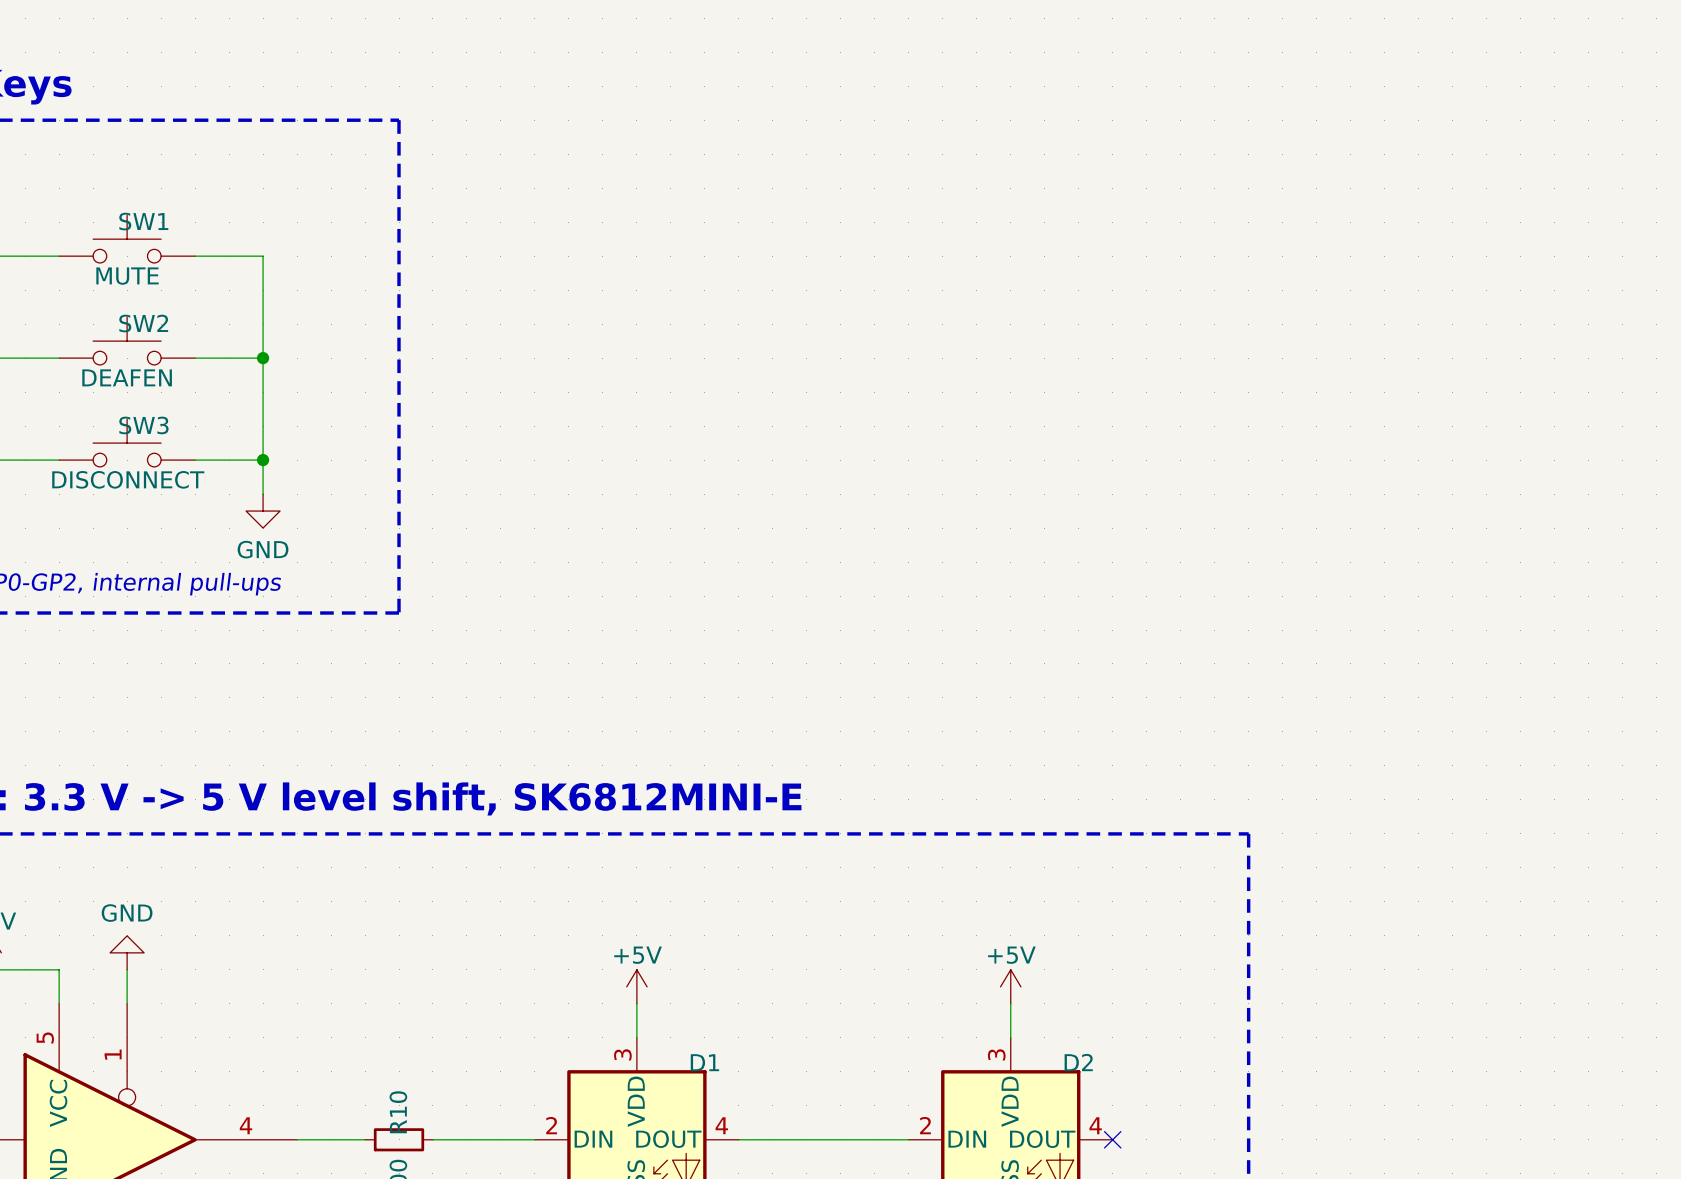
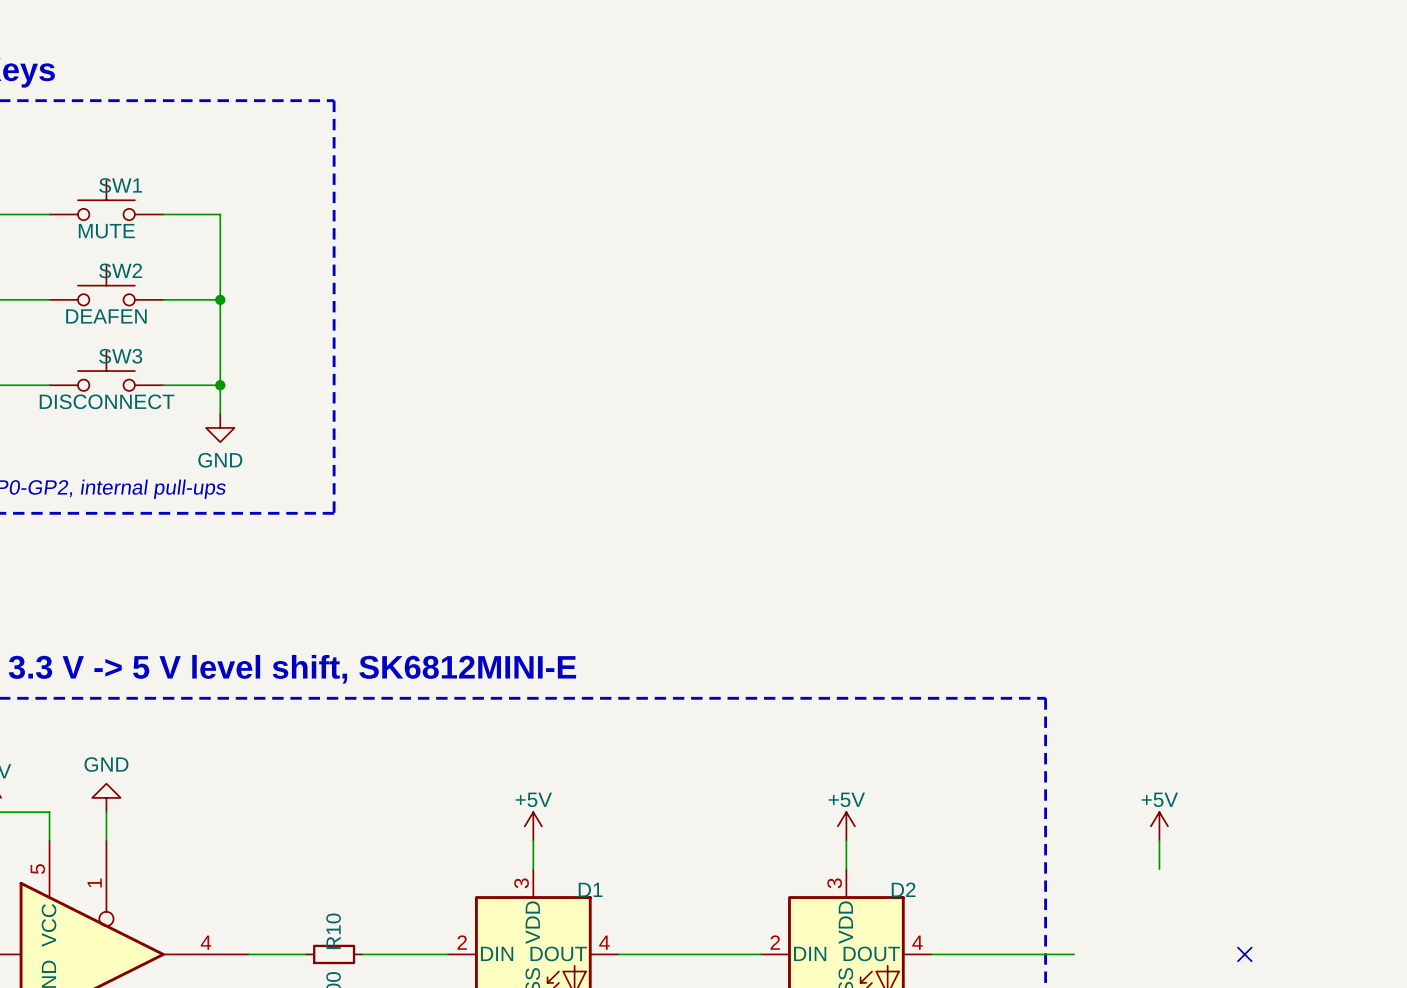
power symbol: none -> +5V (1159, 826)
wire: none -> (1159, 840) (1159, 869)
wire: none -> (931, 954) (1074, 954)
no-connect mark: (1112, 1139) -> none
no-connect mark: none -> (1244, 954)

